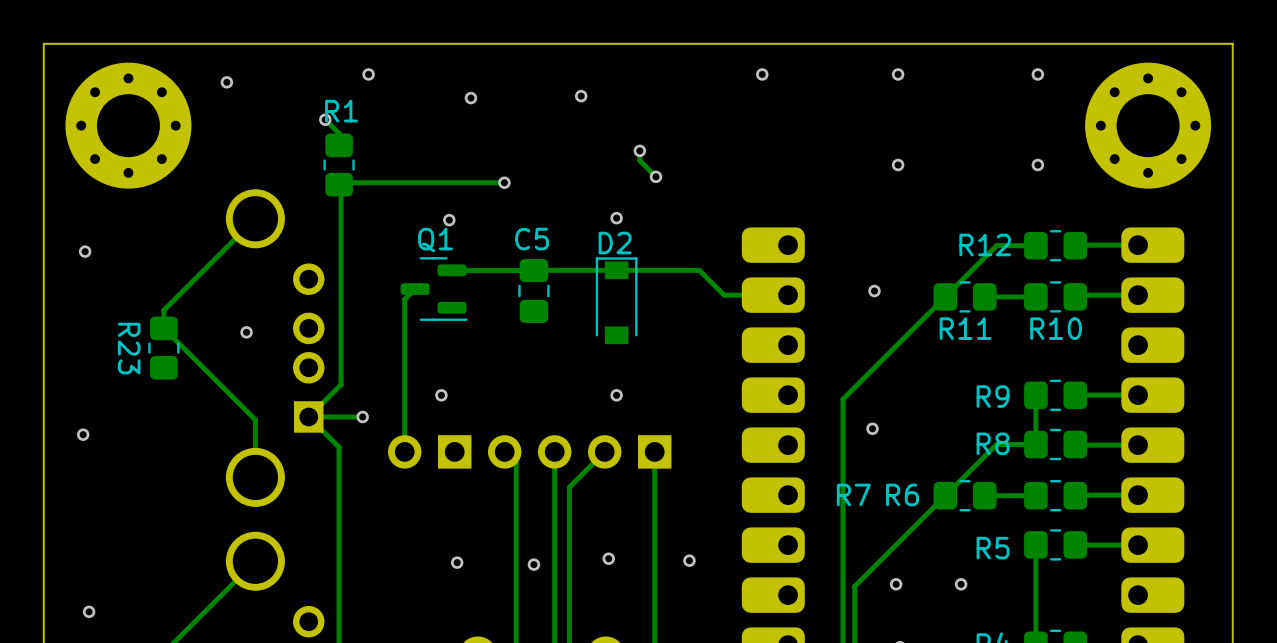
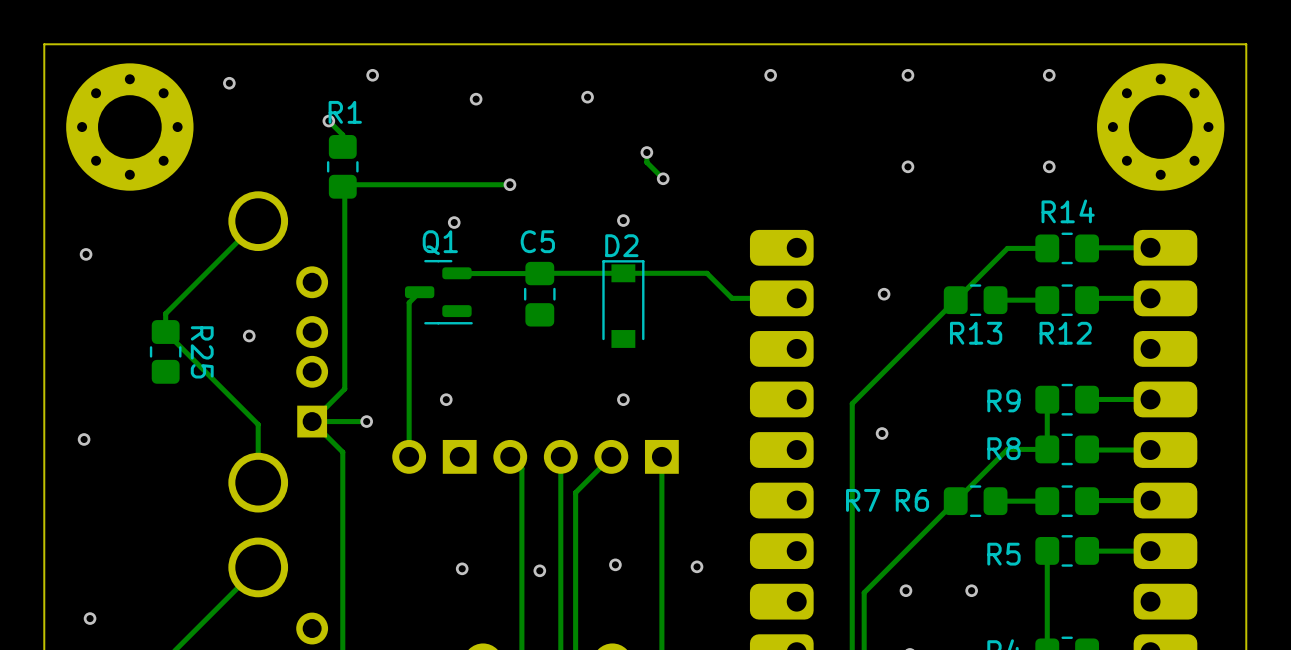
R12 name: R12 (985, 244) -> R14 (1068, 211)
R11 name: R11 (965, 328) -> R13 (976, 333)
R10 name: R10 (1056, 328) -> R12 (1065, 333)
R23 name: R23 (129, 348) -> R25 (202, 352)

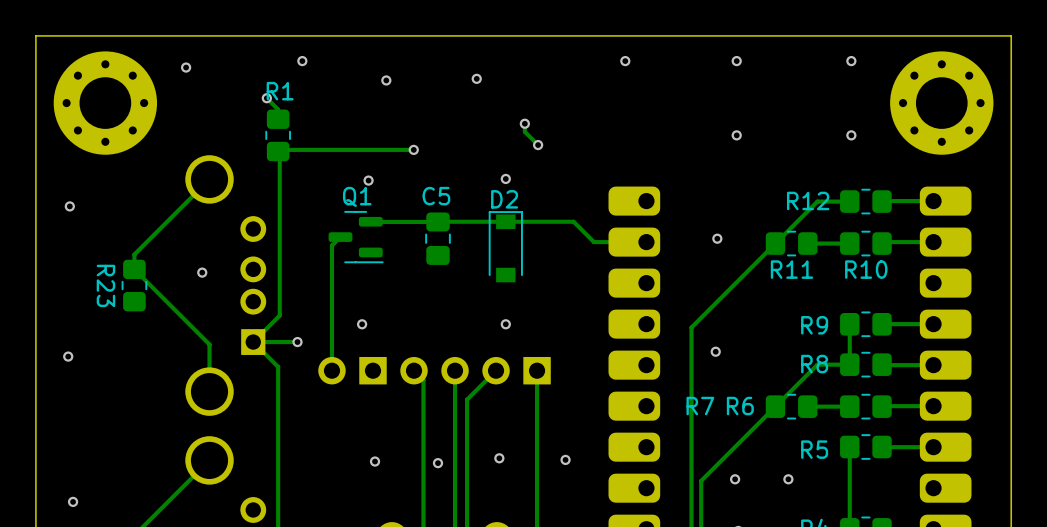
R14 name: R14 (1068, 211) -> R12 (808, 200)
R13 name: R13 (976, 333) -> R11 (792, 269)
R12 name: R12 (1065, 333) -> R10 (866, 269)
R25 name: R25 (202, 352) -> R23 (105, 285)

